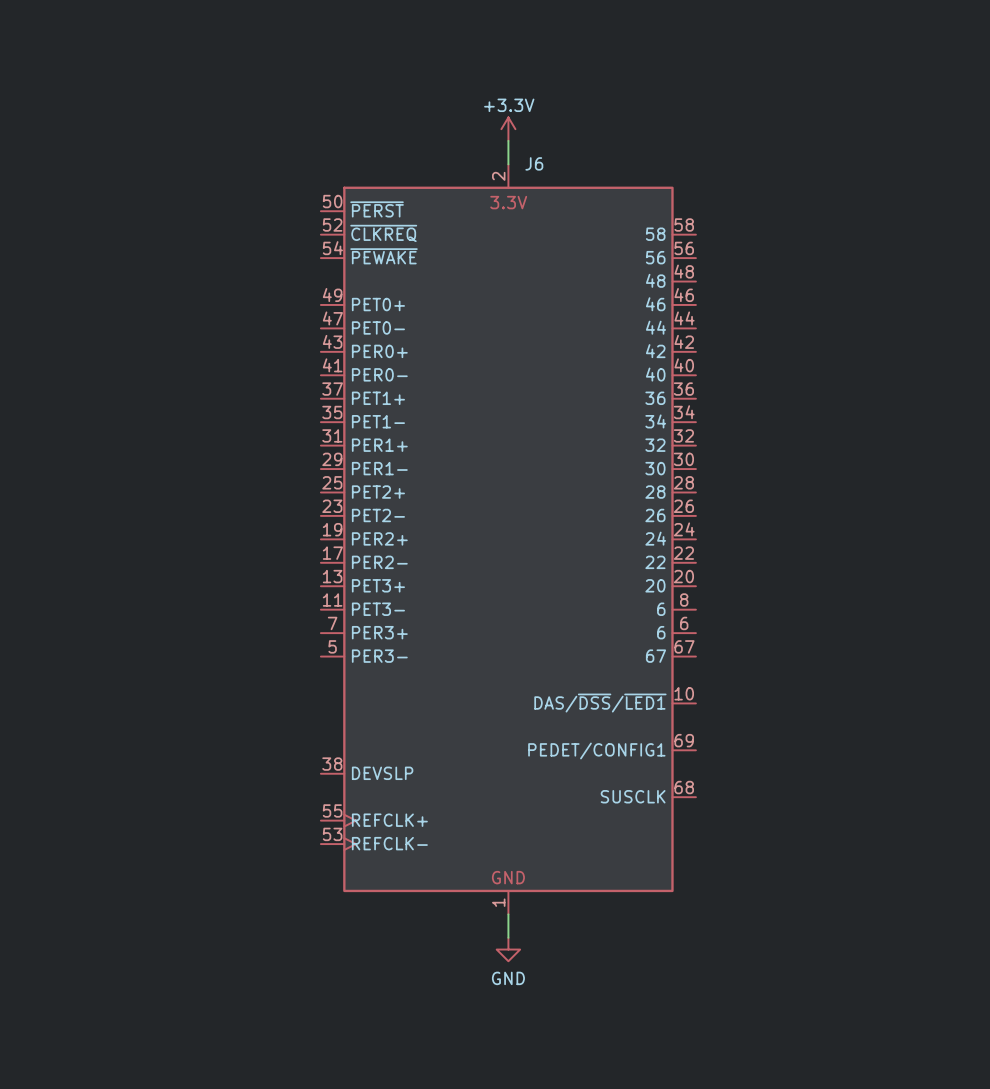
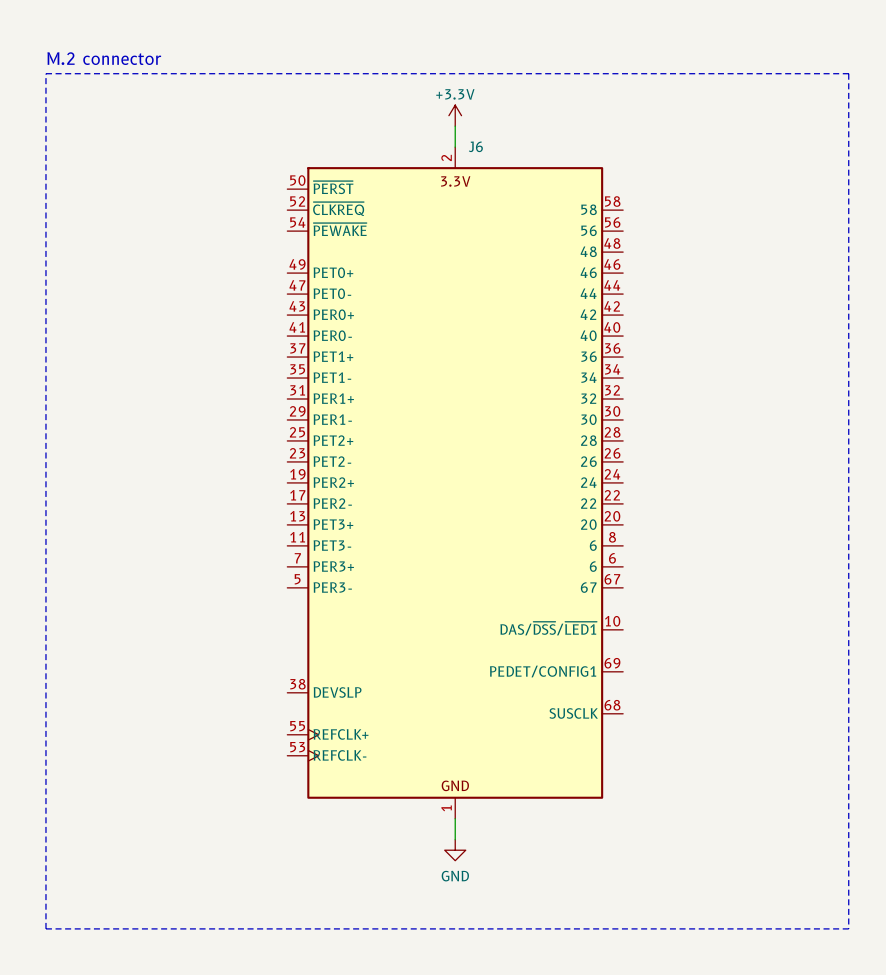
text: none -> M.2 connector (104, 58)
line: none -> (45, 73) (848, 73) (848, 928) (45, 928) (45, 73)

